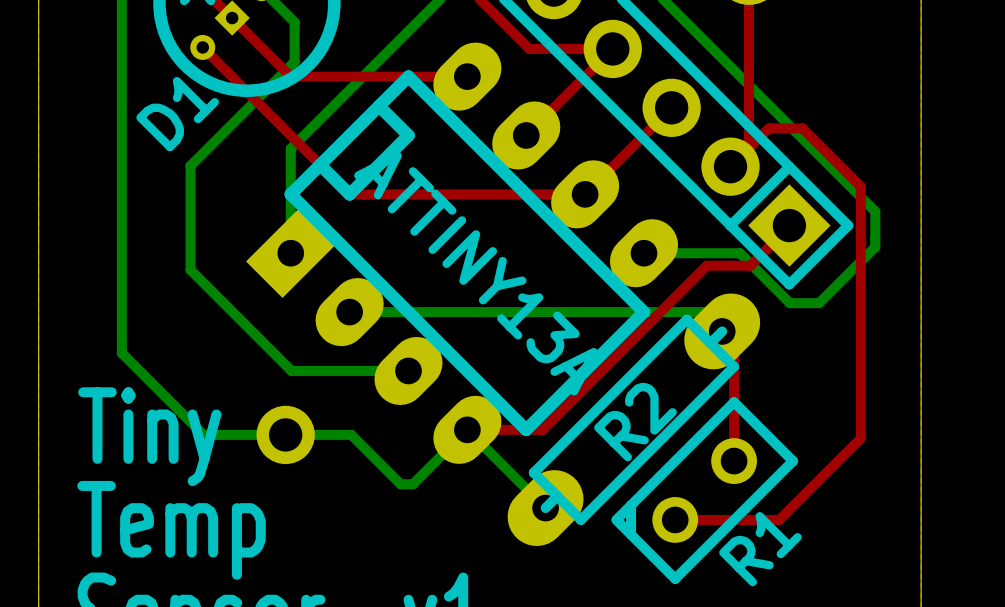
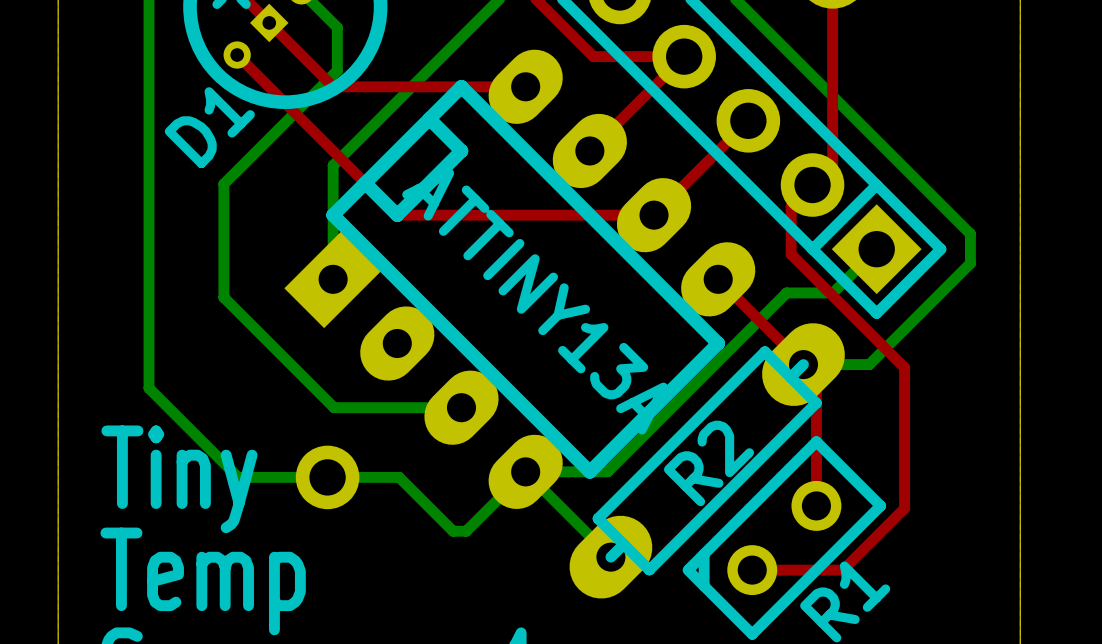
top track: (748, 148) (768, 128) (802, 128) (860, 186) (860, 438) (779, 519) (758, 519) -> (812, 185) (791, 206) (791, 254) (904, 367) (904, 508) (842, 570)
top track: (789, 225) (750, 265) (706, 265) (542, 429) (467, 429) -> none
bottom track: none -> (876, 249) (832, 292) (786, 292) (607, 471) (525, 471)
bottom track: (875, 238) (875, 246) (819, 303) (790, 303) (740, 253) (643, 253) -> (970, 263) (869, 364) (803, 364)
top track: none -> (718, 279) (803, 364)
bottom track: (349, 312) (702, 312) (722, 331) -> none

